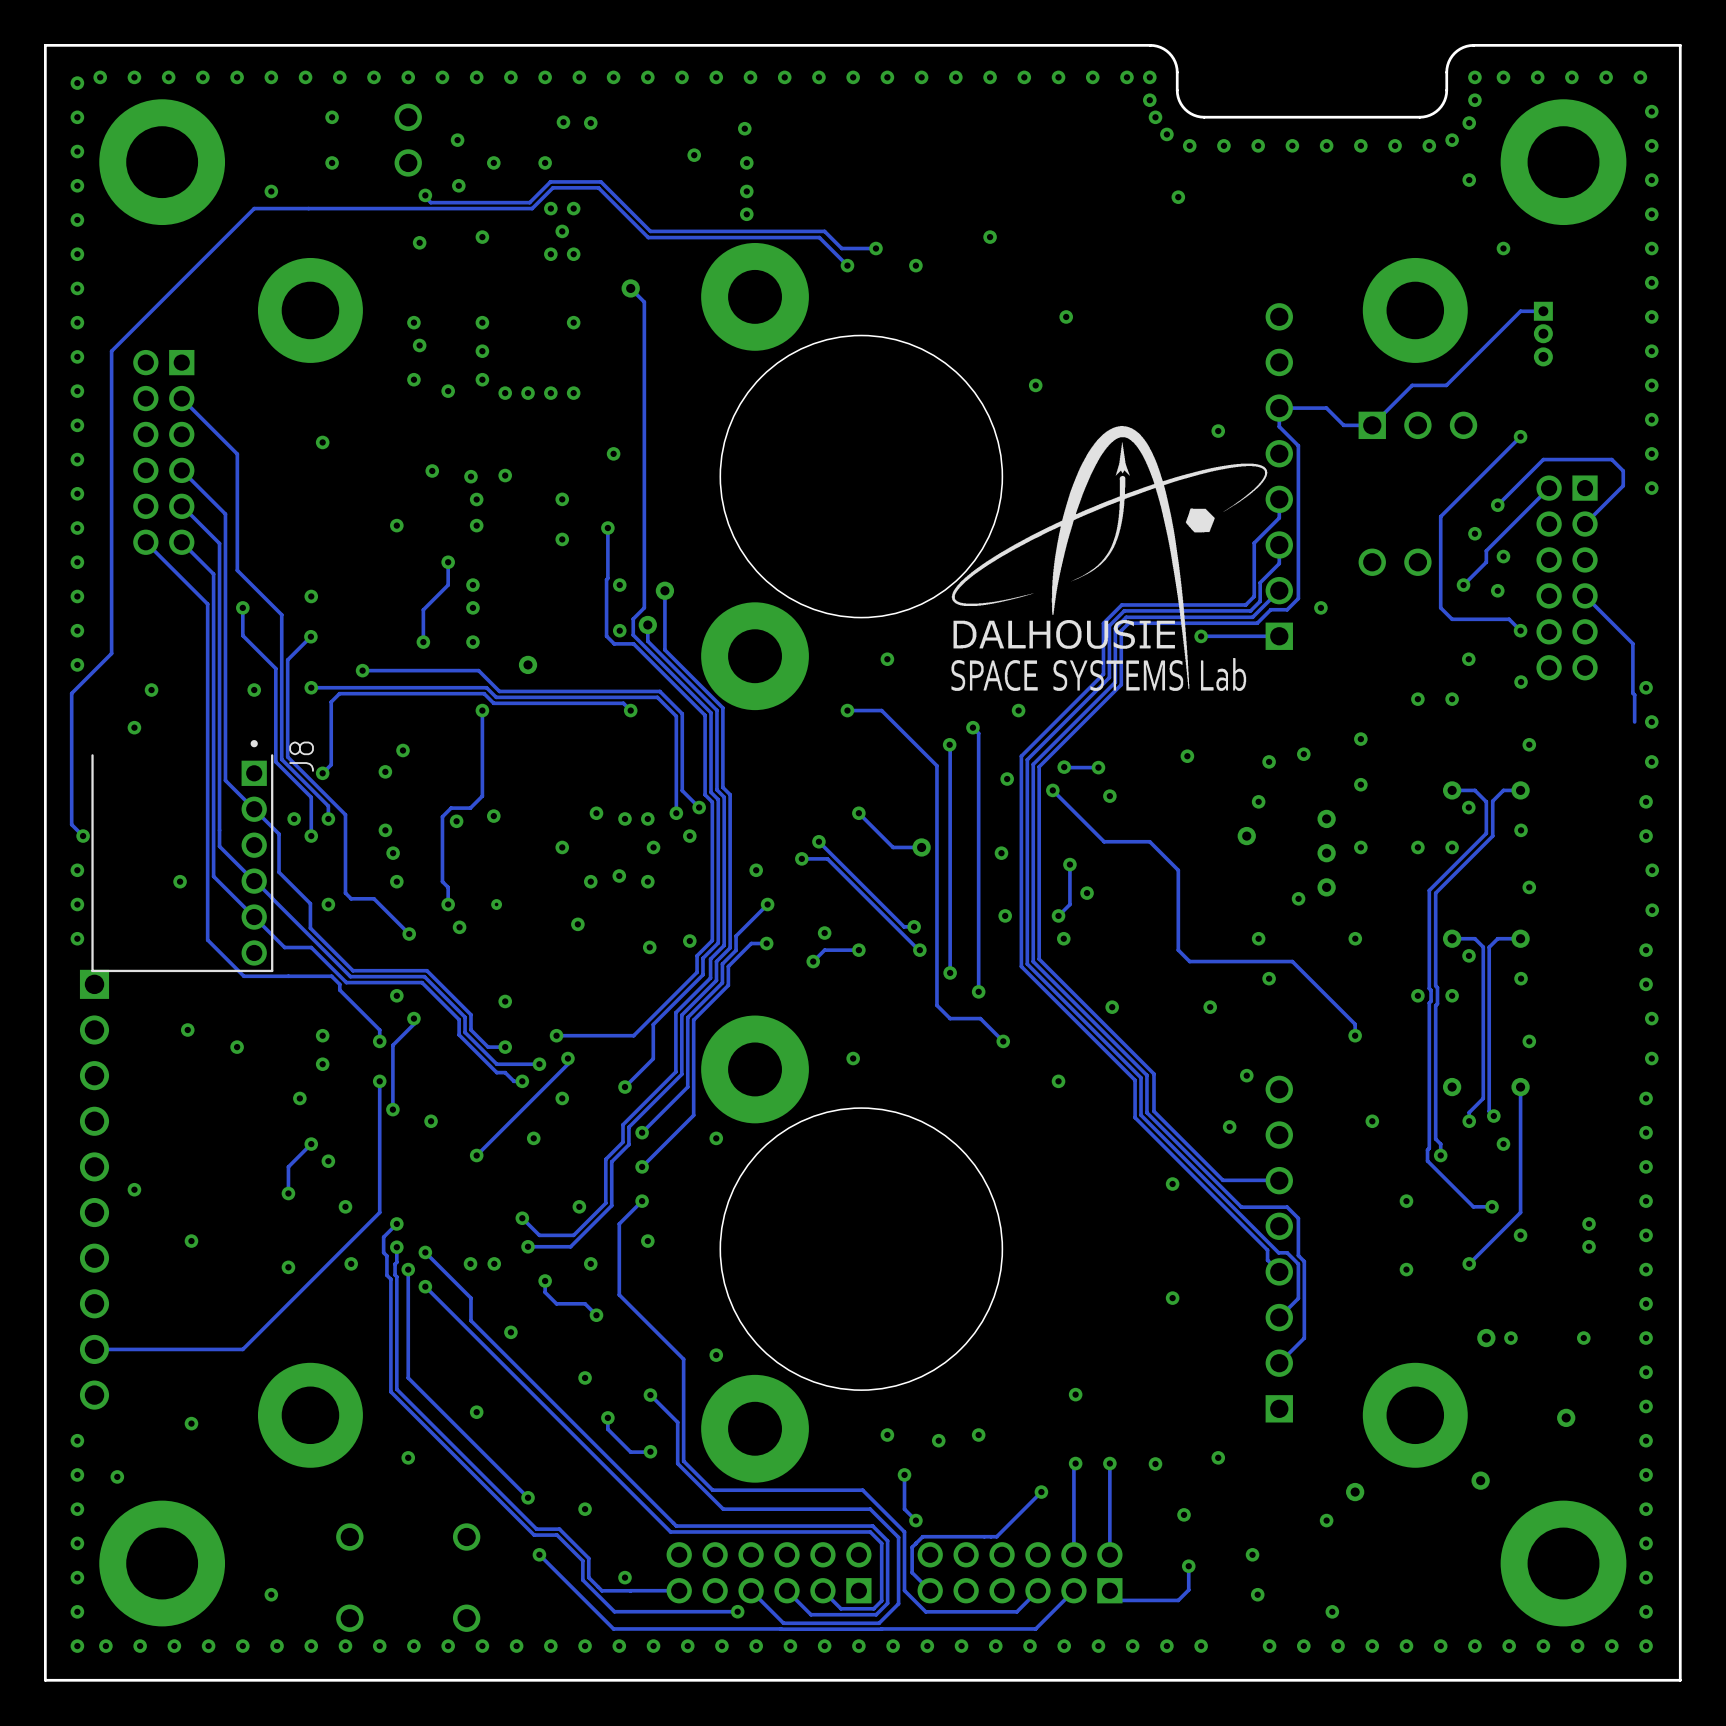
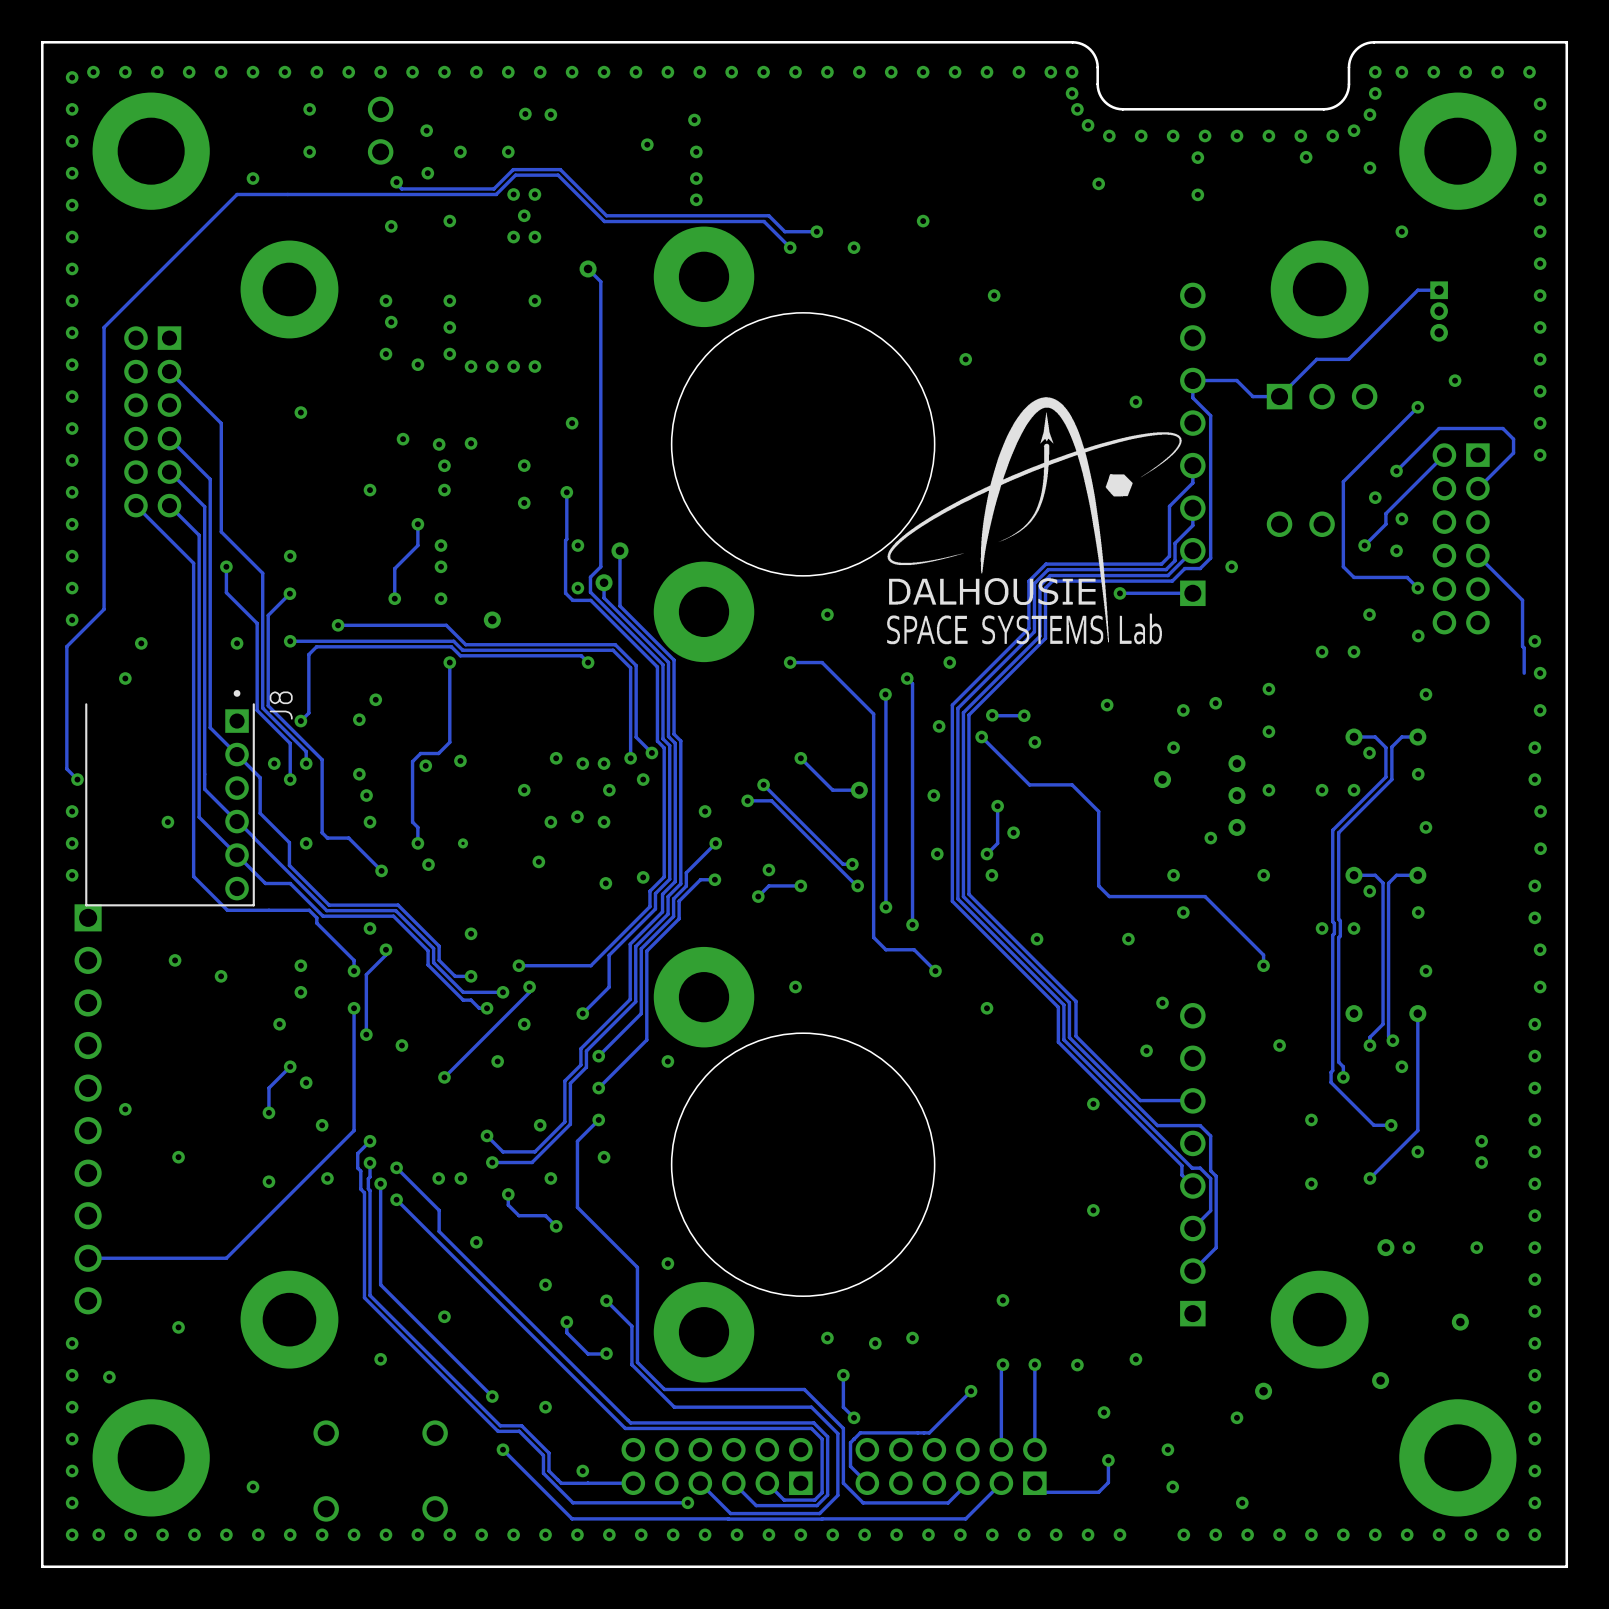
via: none -> (1306, 157)
via: none -> (1197, 157)
via: none -> (1197, 194)
via: none -> (1455, 380)

